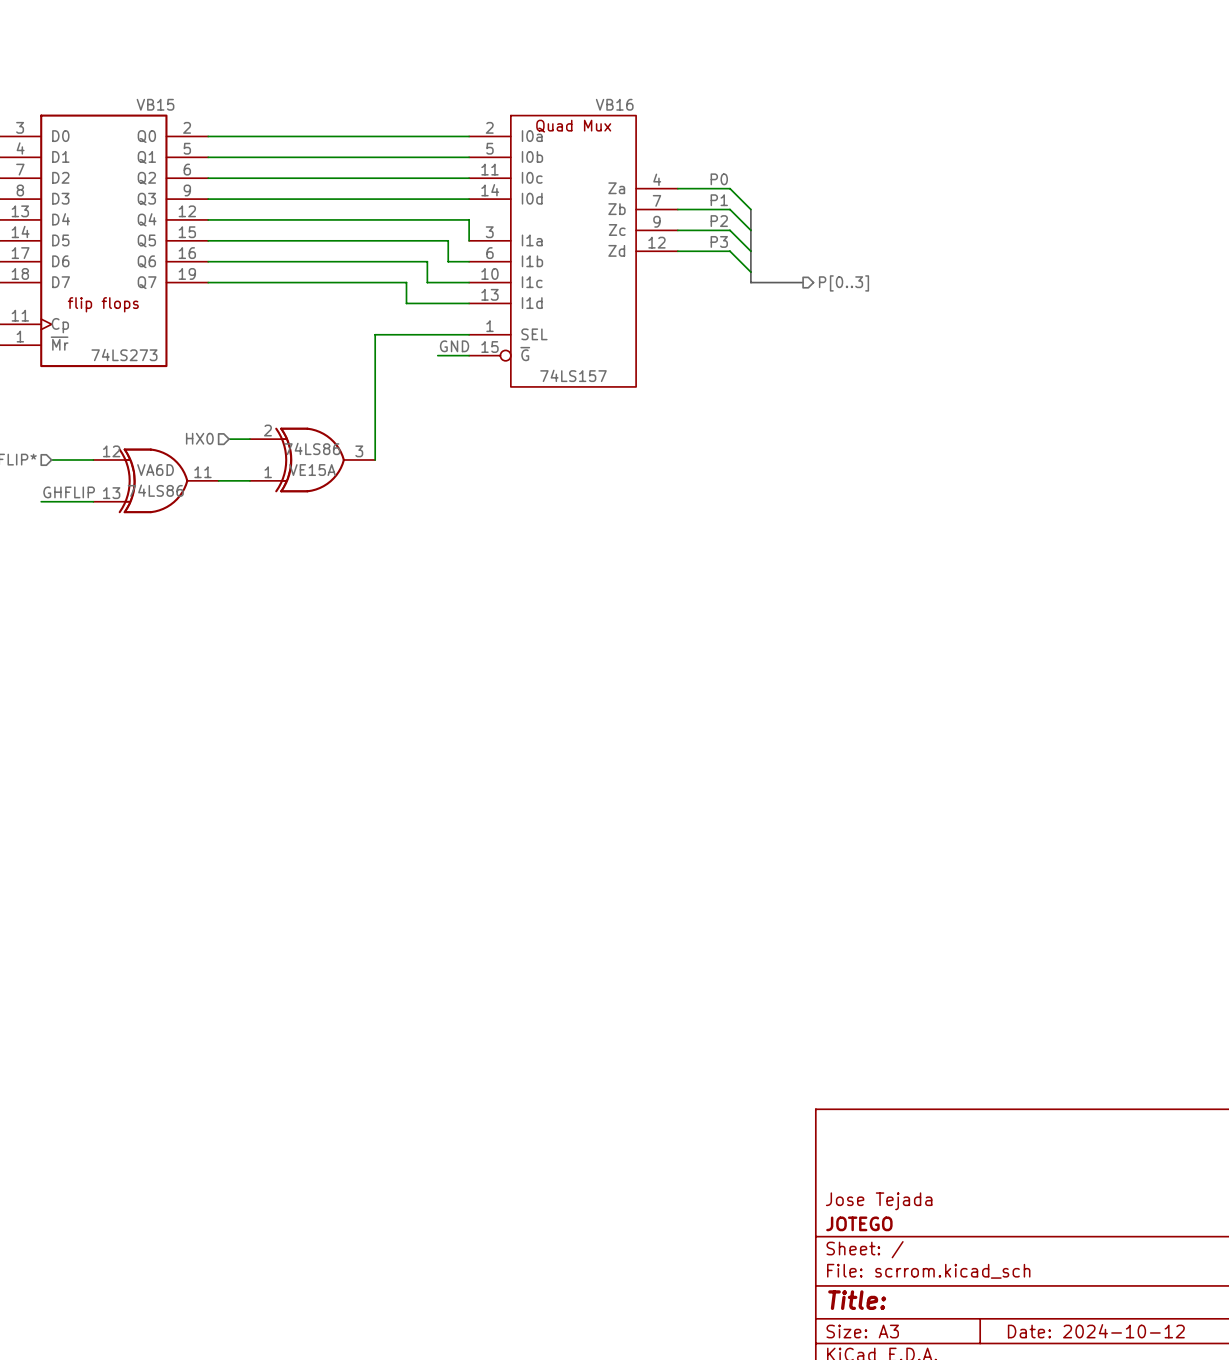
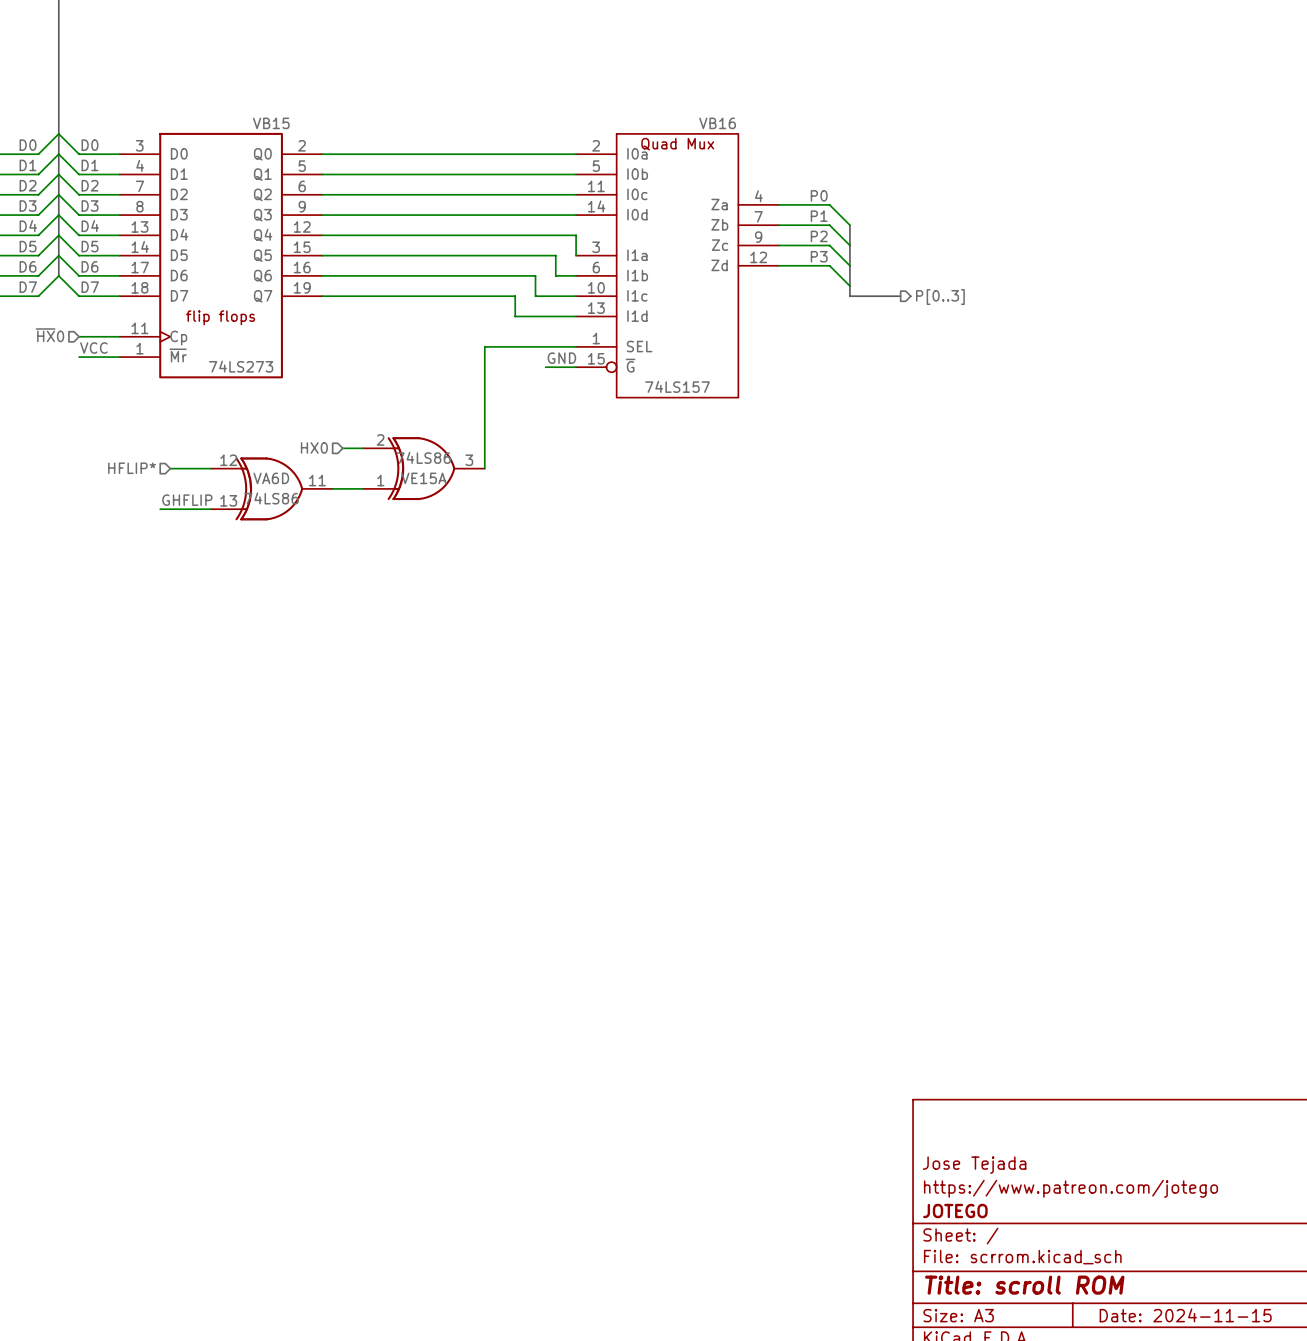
title block: none -> Jose Tejada (974, 1165)
title block: Jose Tejada (879, 1201) -> https://www.patreon.com/jotego (1070, 1188)
title block: Title: (857, 1300) -> Title: scroll ROM (1024, 1285)
title block: Date: 2024-10-12 (1096, 1331) -> Date: 2024-11-15 (1185, 1315)

